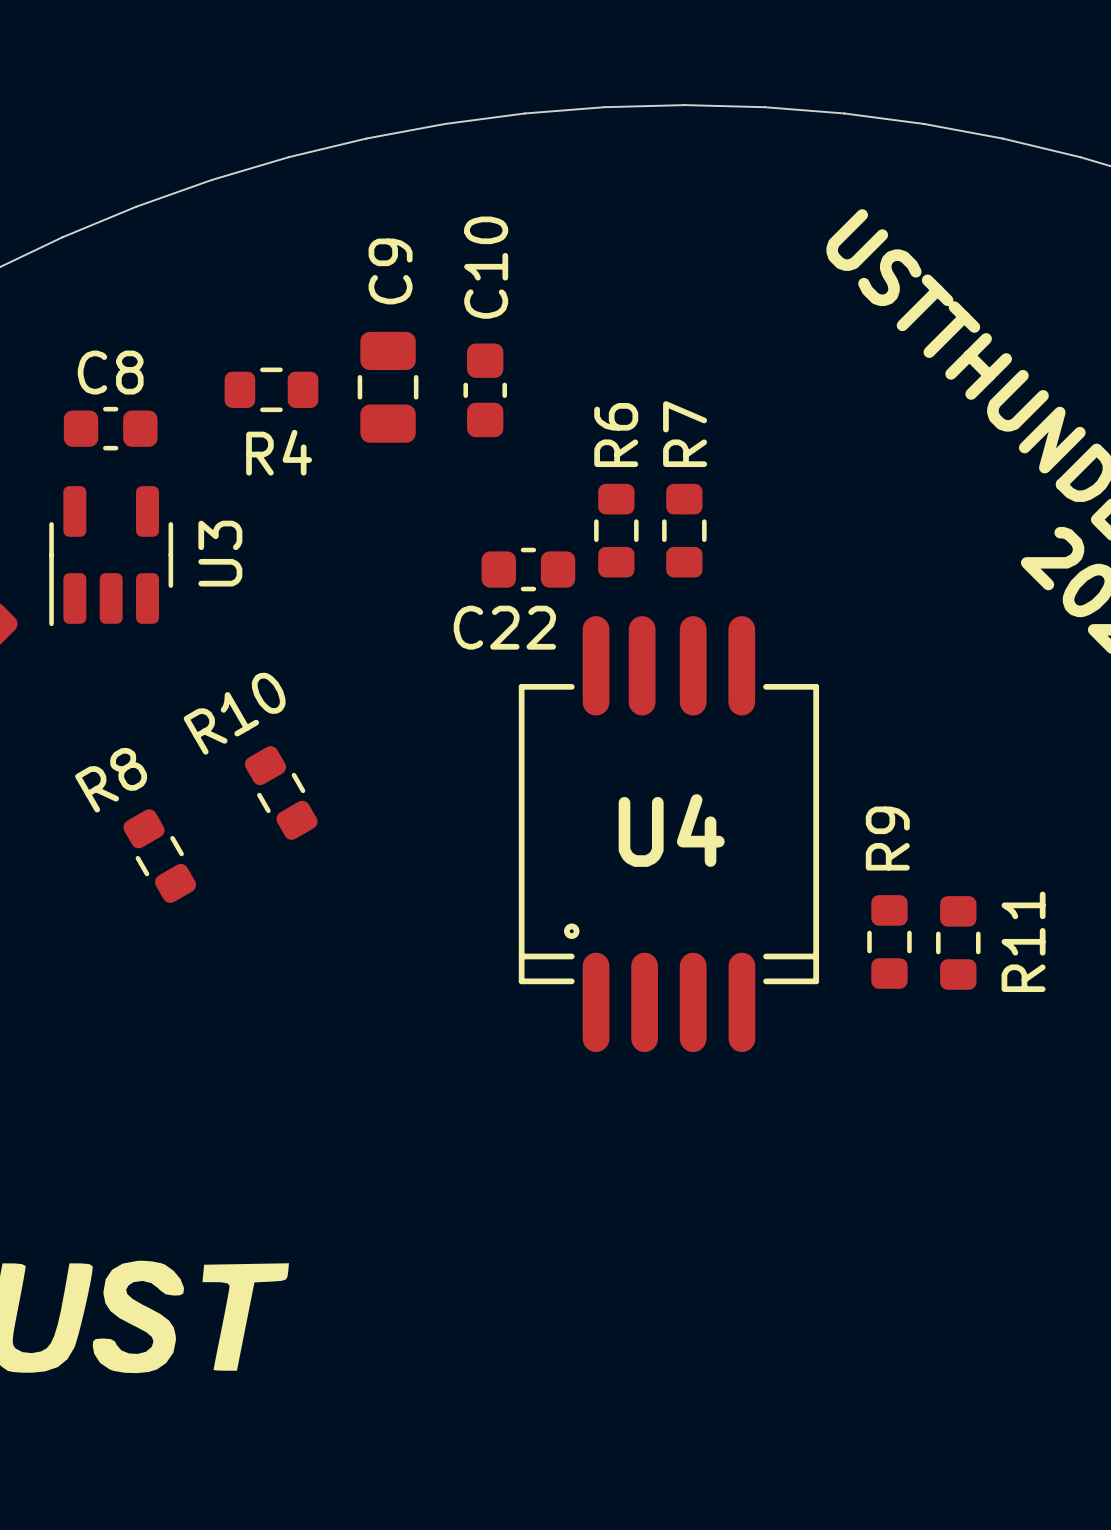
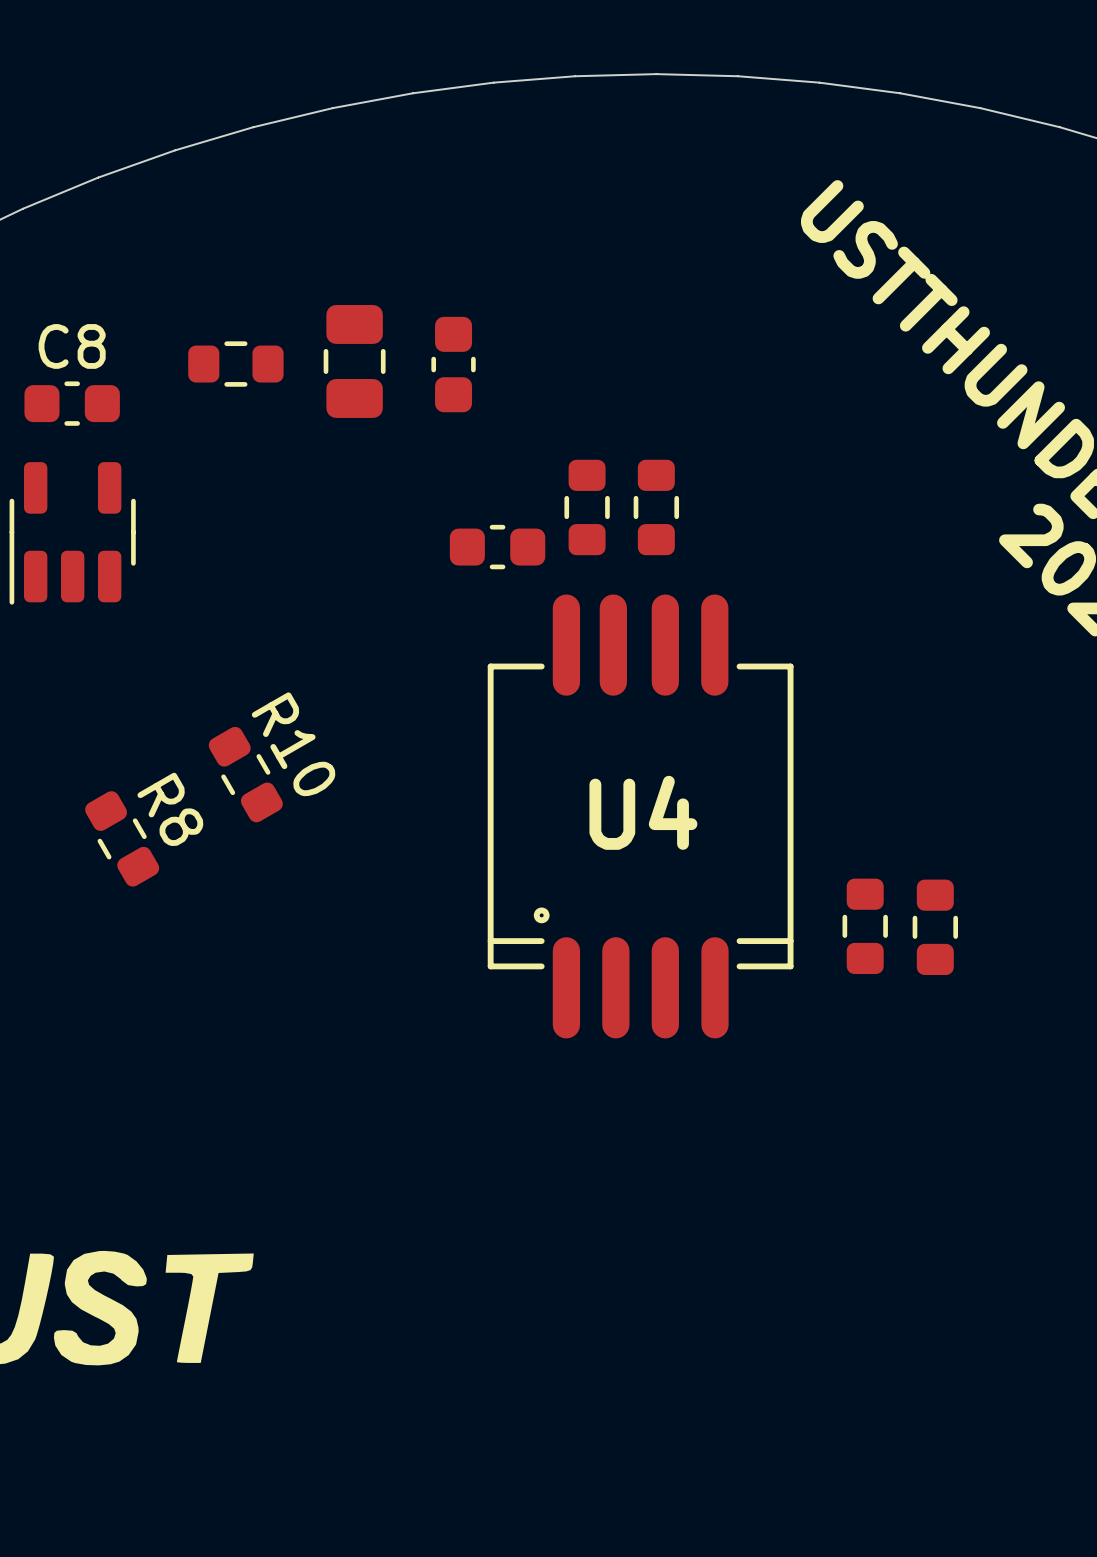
C10 name: C10 (486, 267) -> none
C9 name: C9 (390, 271) -> none
R7 name: R7 (685, 434) -> none
R6 name: R6 (616, 435) -> none
R4 name: R4 (279, 452) -> none
U3 name: U3 (220, 553) -> none
C22 name: C22 (504, 627) -> none
R10 name rotation: 0° (234, 713) -> 90° clockwise (293, 744)
R8 name rotation: 0° (111, 780) -> 90° clockwise (170, 809)
R9 name: R9 (887, 838) -> none
R11 name: R11 (1023, 941) -> none

